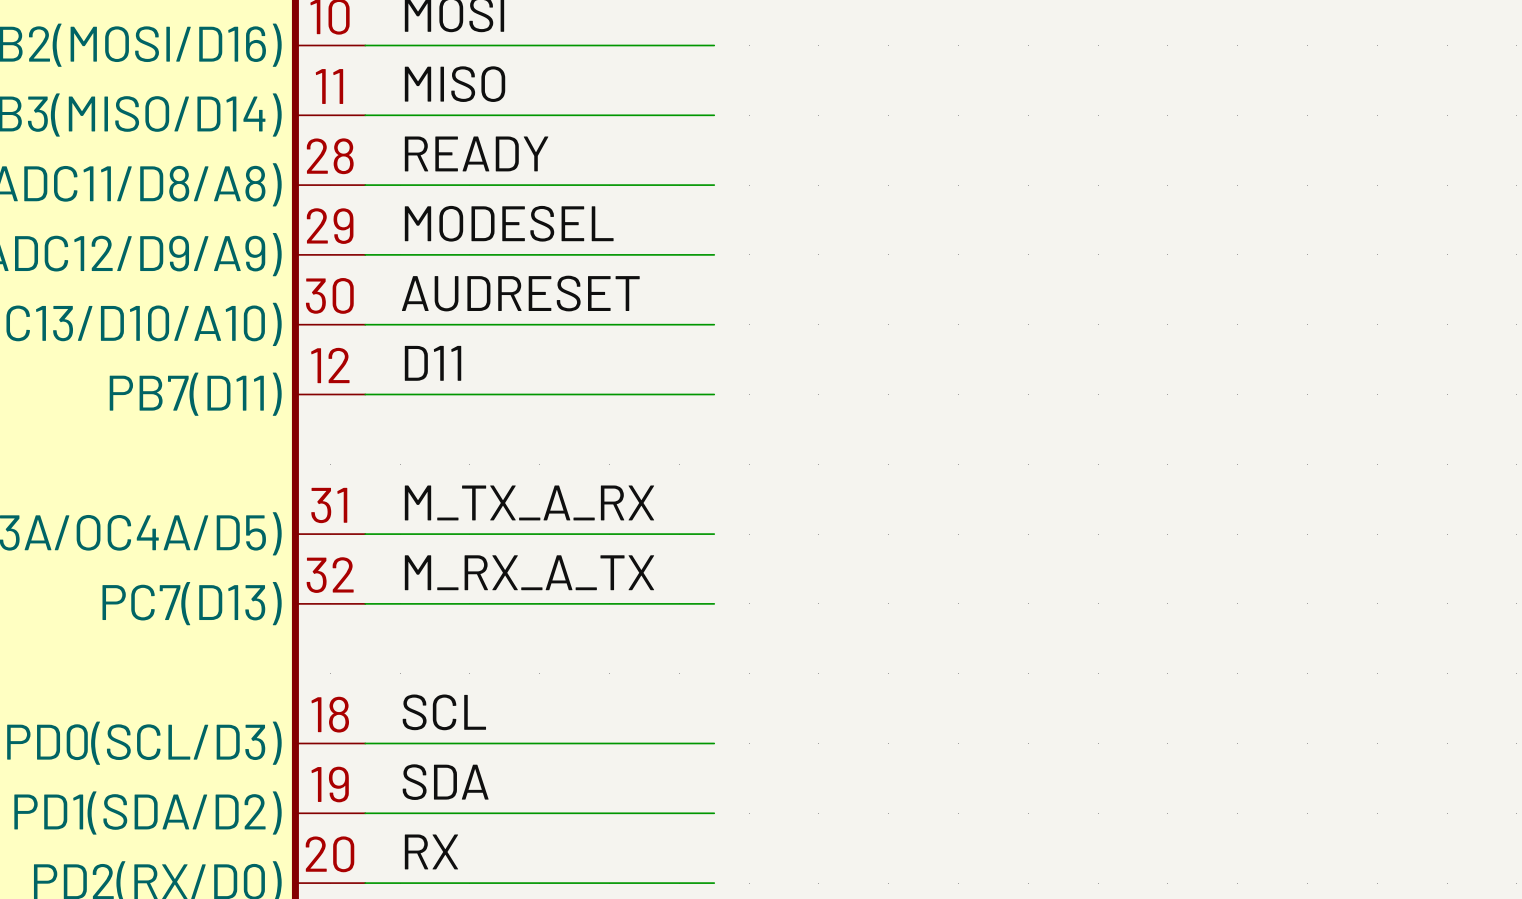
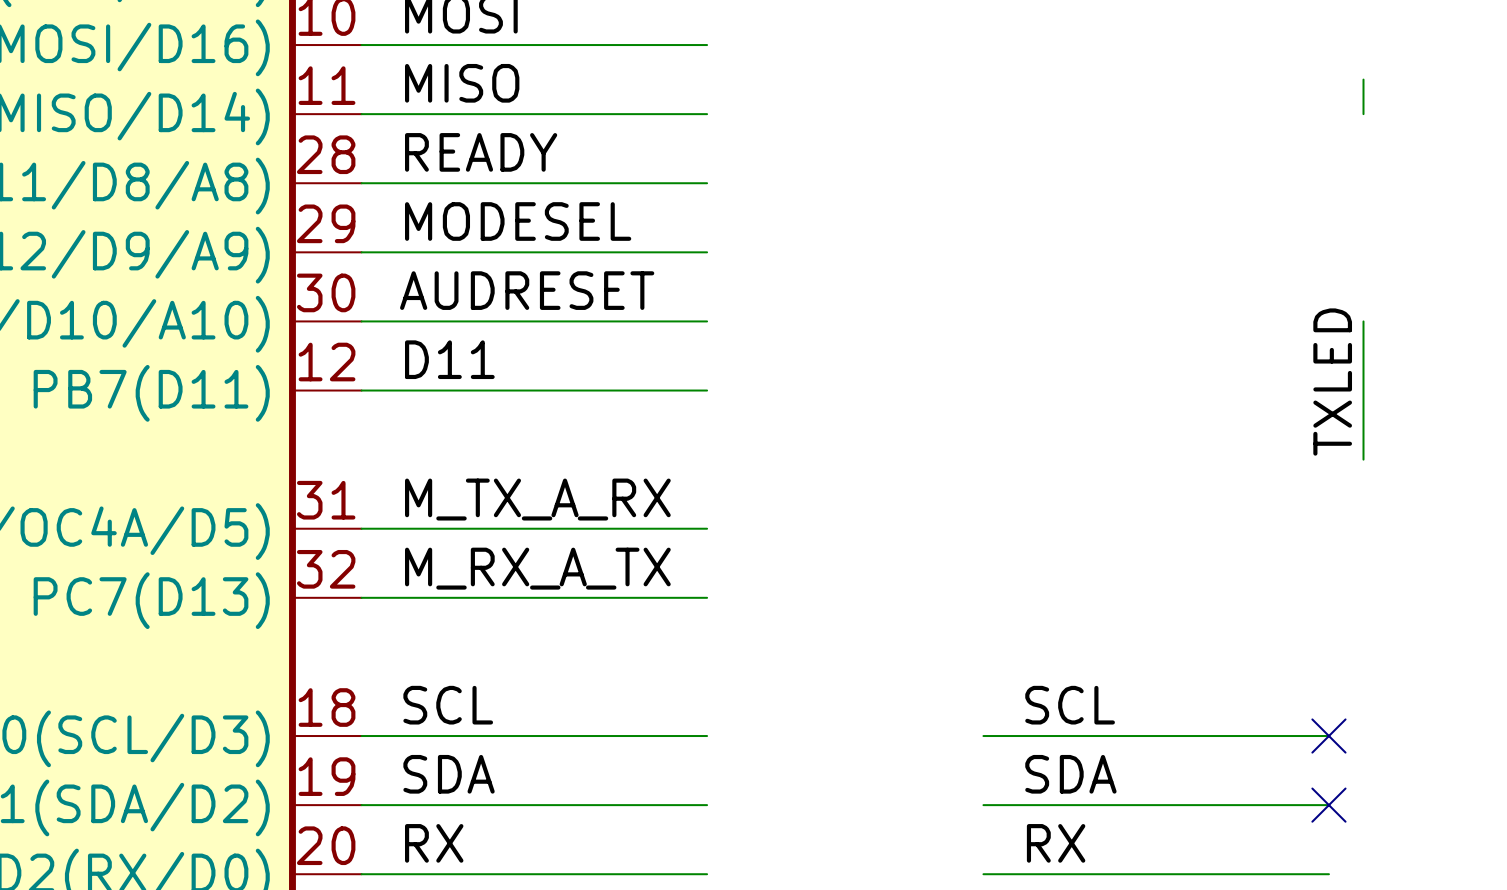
wire: none -> (1363, 79) (1363, 114)
wire: none -> (1363, 321) (1363, 459)
label: none -> TXLED (1332, 382)
label: none -> SCL (1070, 705)
wire: none -> (983, 736) (1328, 736)
no-connect mark: none -> (1328, 736)
label: none -> SDA (1070, 774)
wire: none -> (983, 805) (1328, 805)
no-connect mark: none -> (1328, 805)
label: none -> RX (1056, 843)
wire: none -> (983, 874) (1328, 874)

